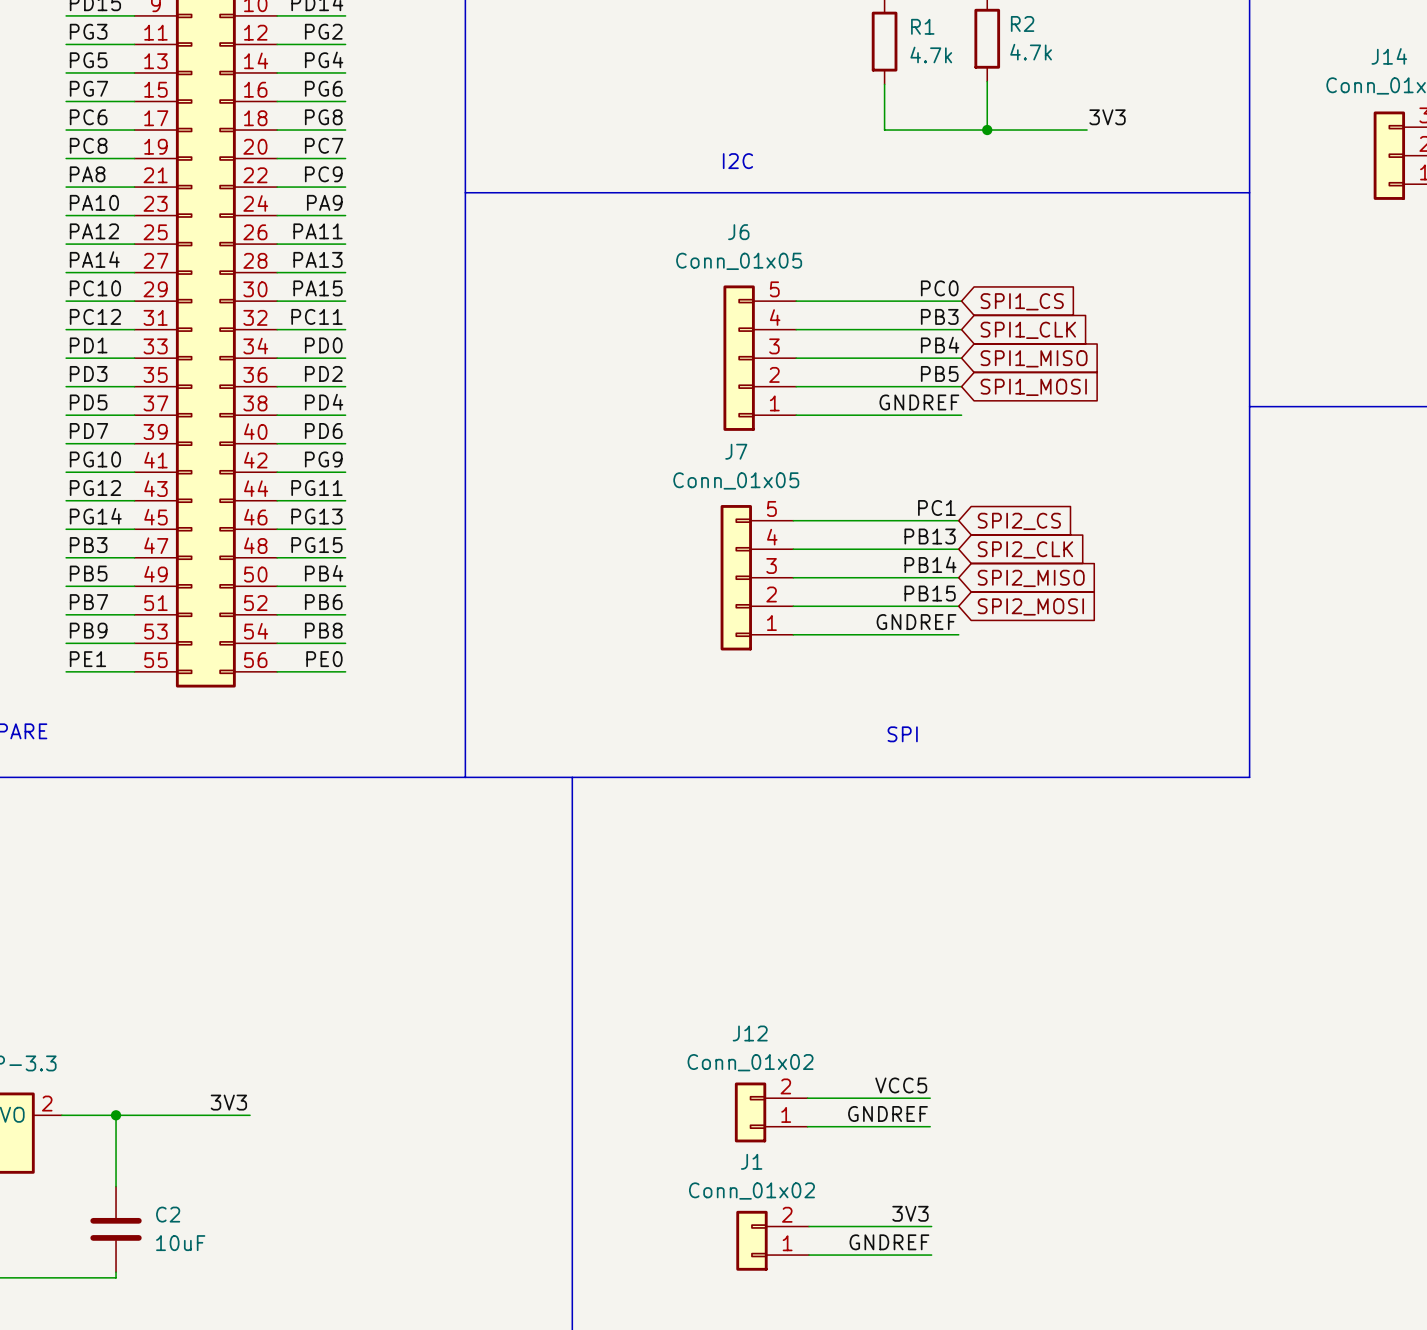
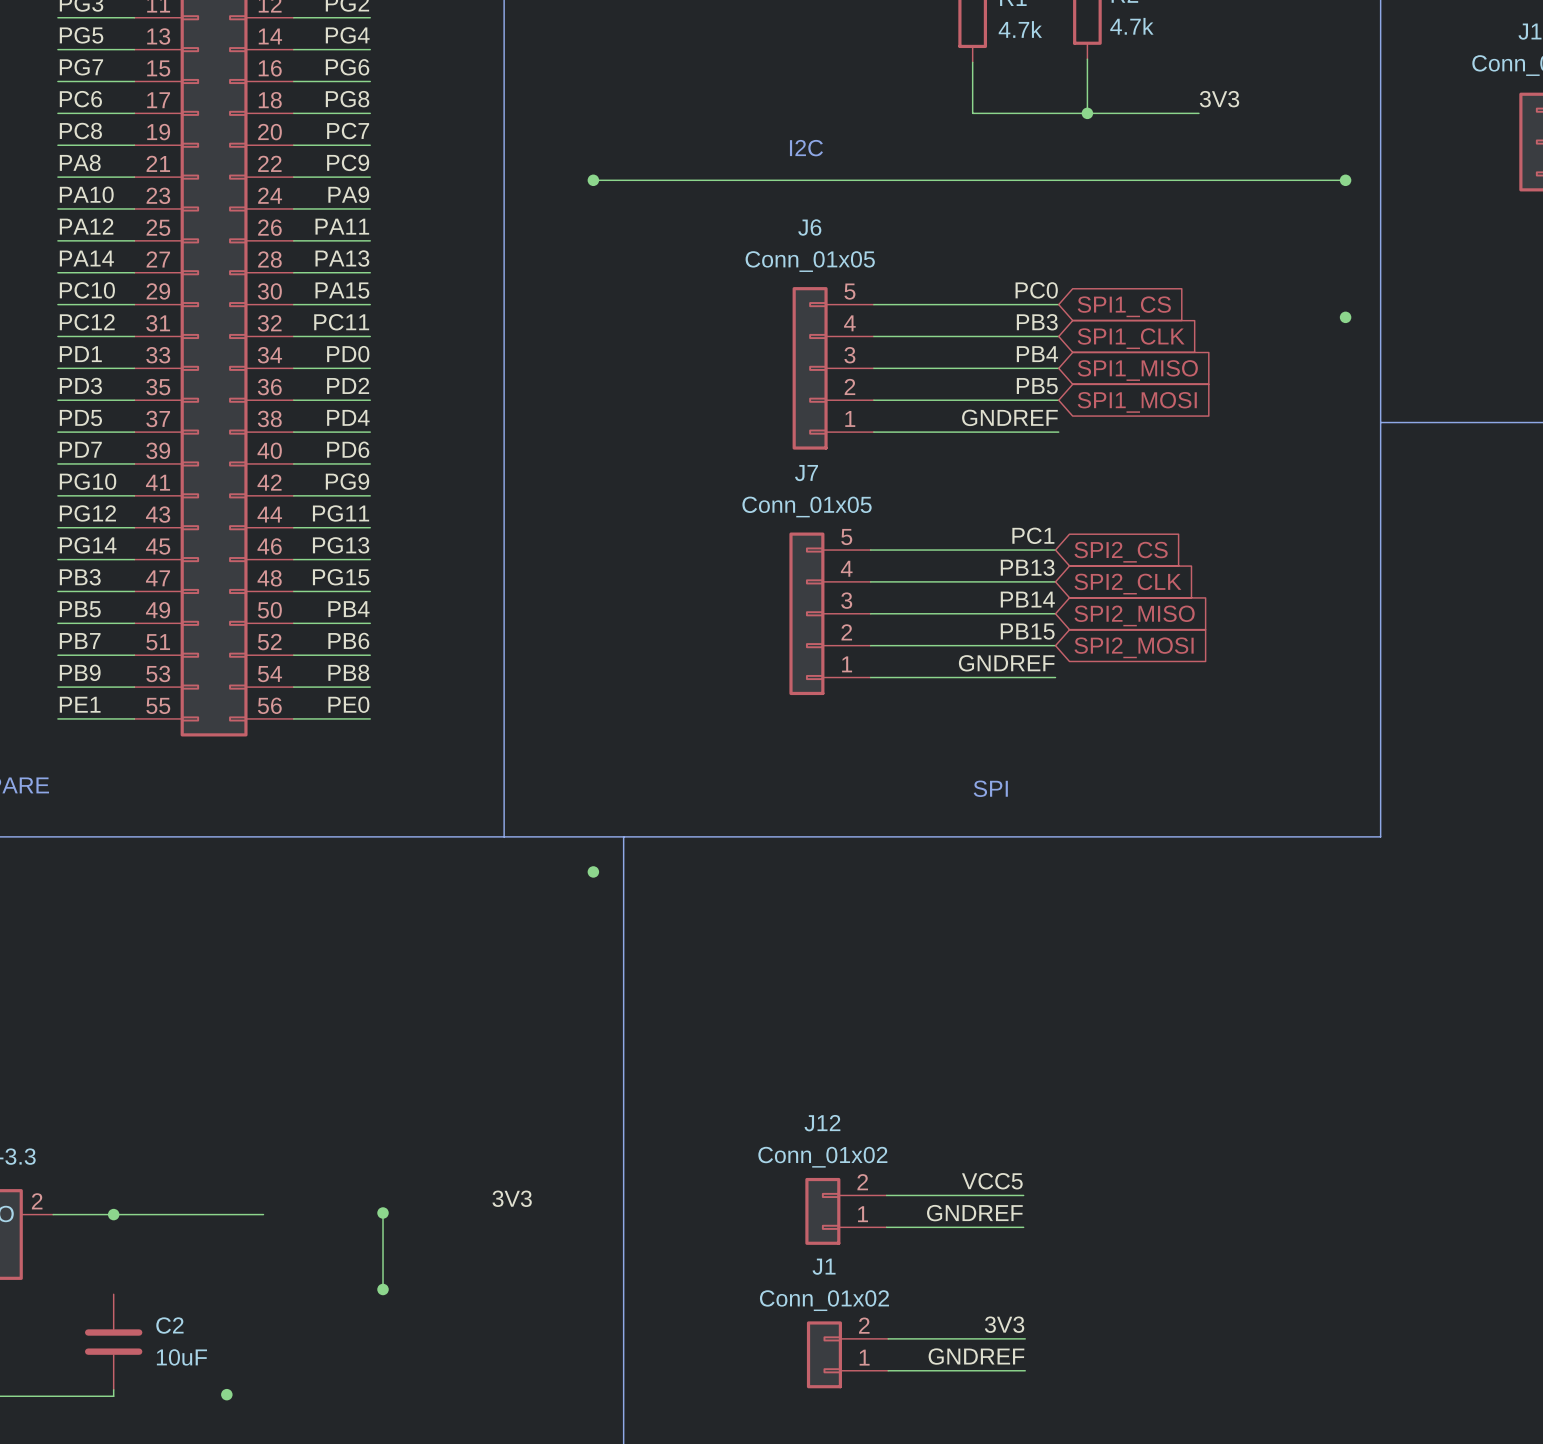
wire: none -> (593, 180) (1345, 180)
junction: none -> (593, 180)
junction: none -> (1345, 180)
line: (465, 192) (1249, 192) -> none
junction: none -> (1345, 317)
junction: none -> (593, 871)
label position: 3V3 (228, 1102) -> 3V3 (512, 1198)
junction: none -> (383, 1212)
wire: (116, 1115) (116, 1186) -> (383, 1212) (383, 1292)
junction: none -> (383, 1289)
junction: none -> (226, 1394)

